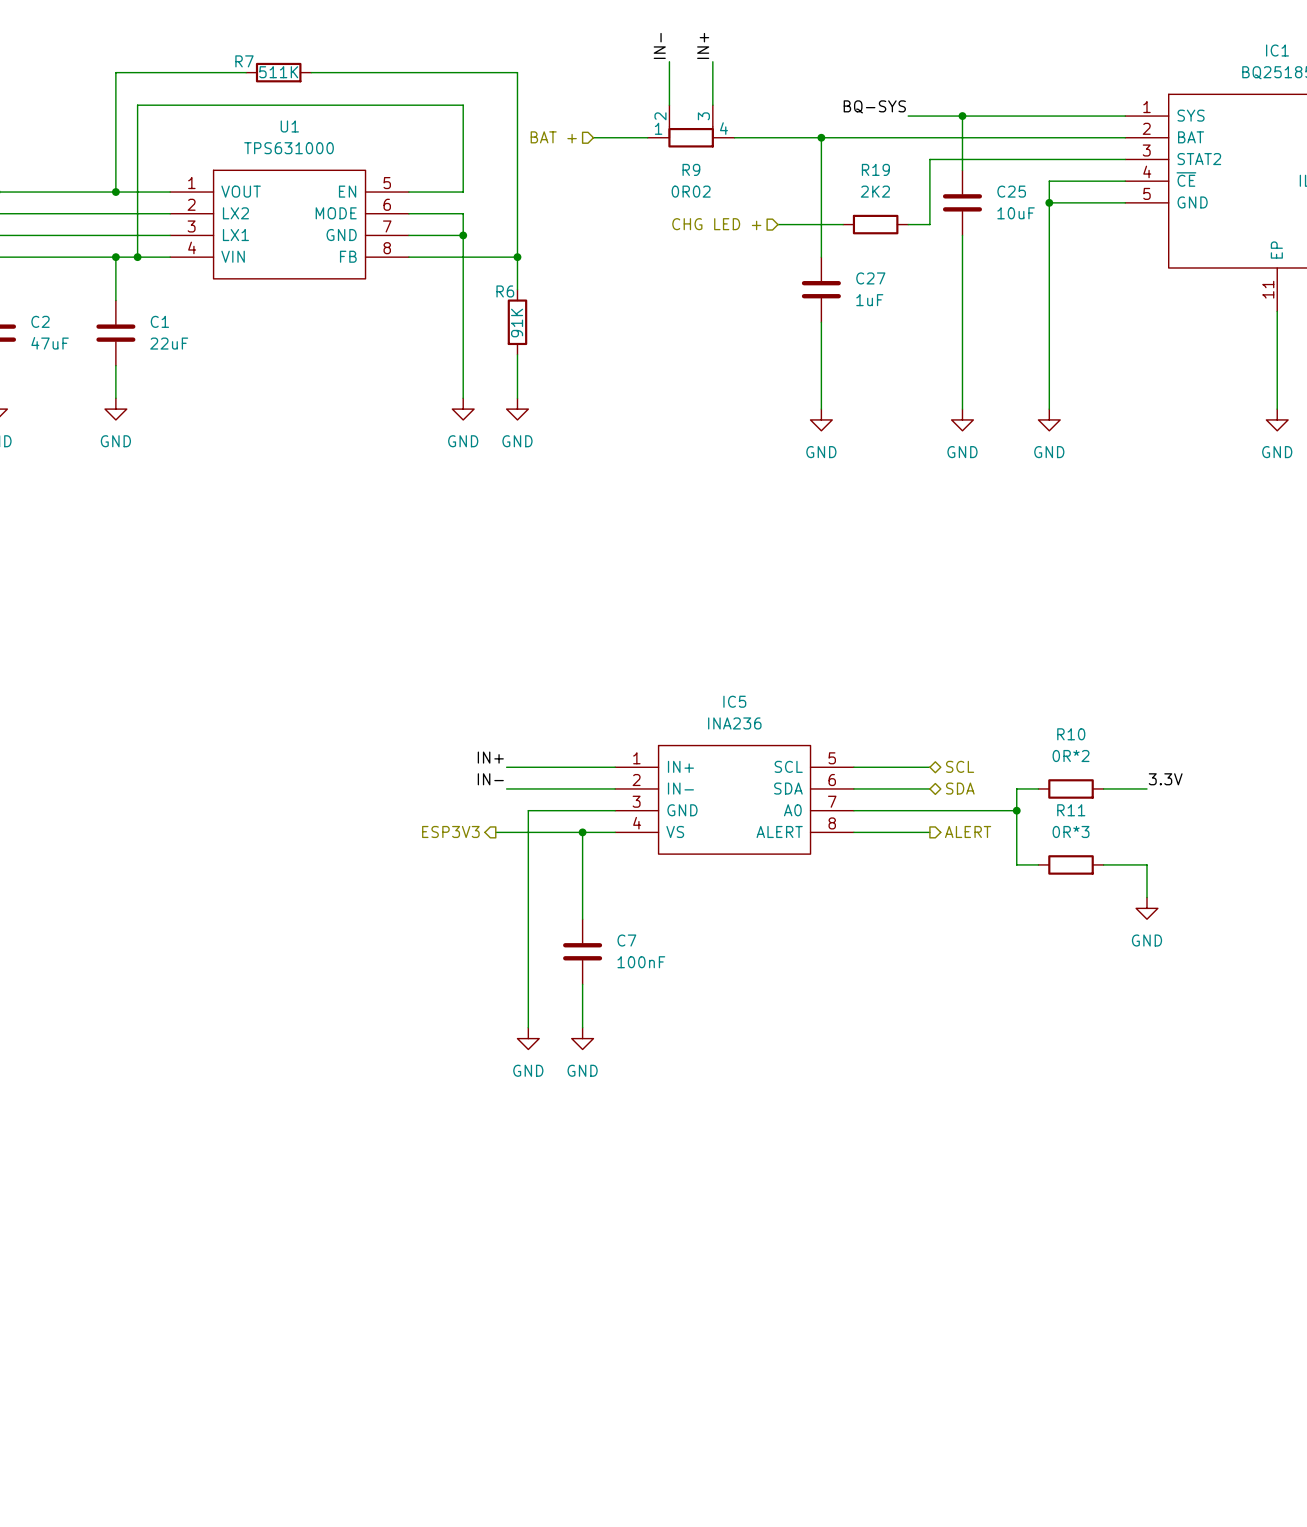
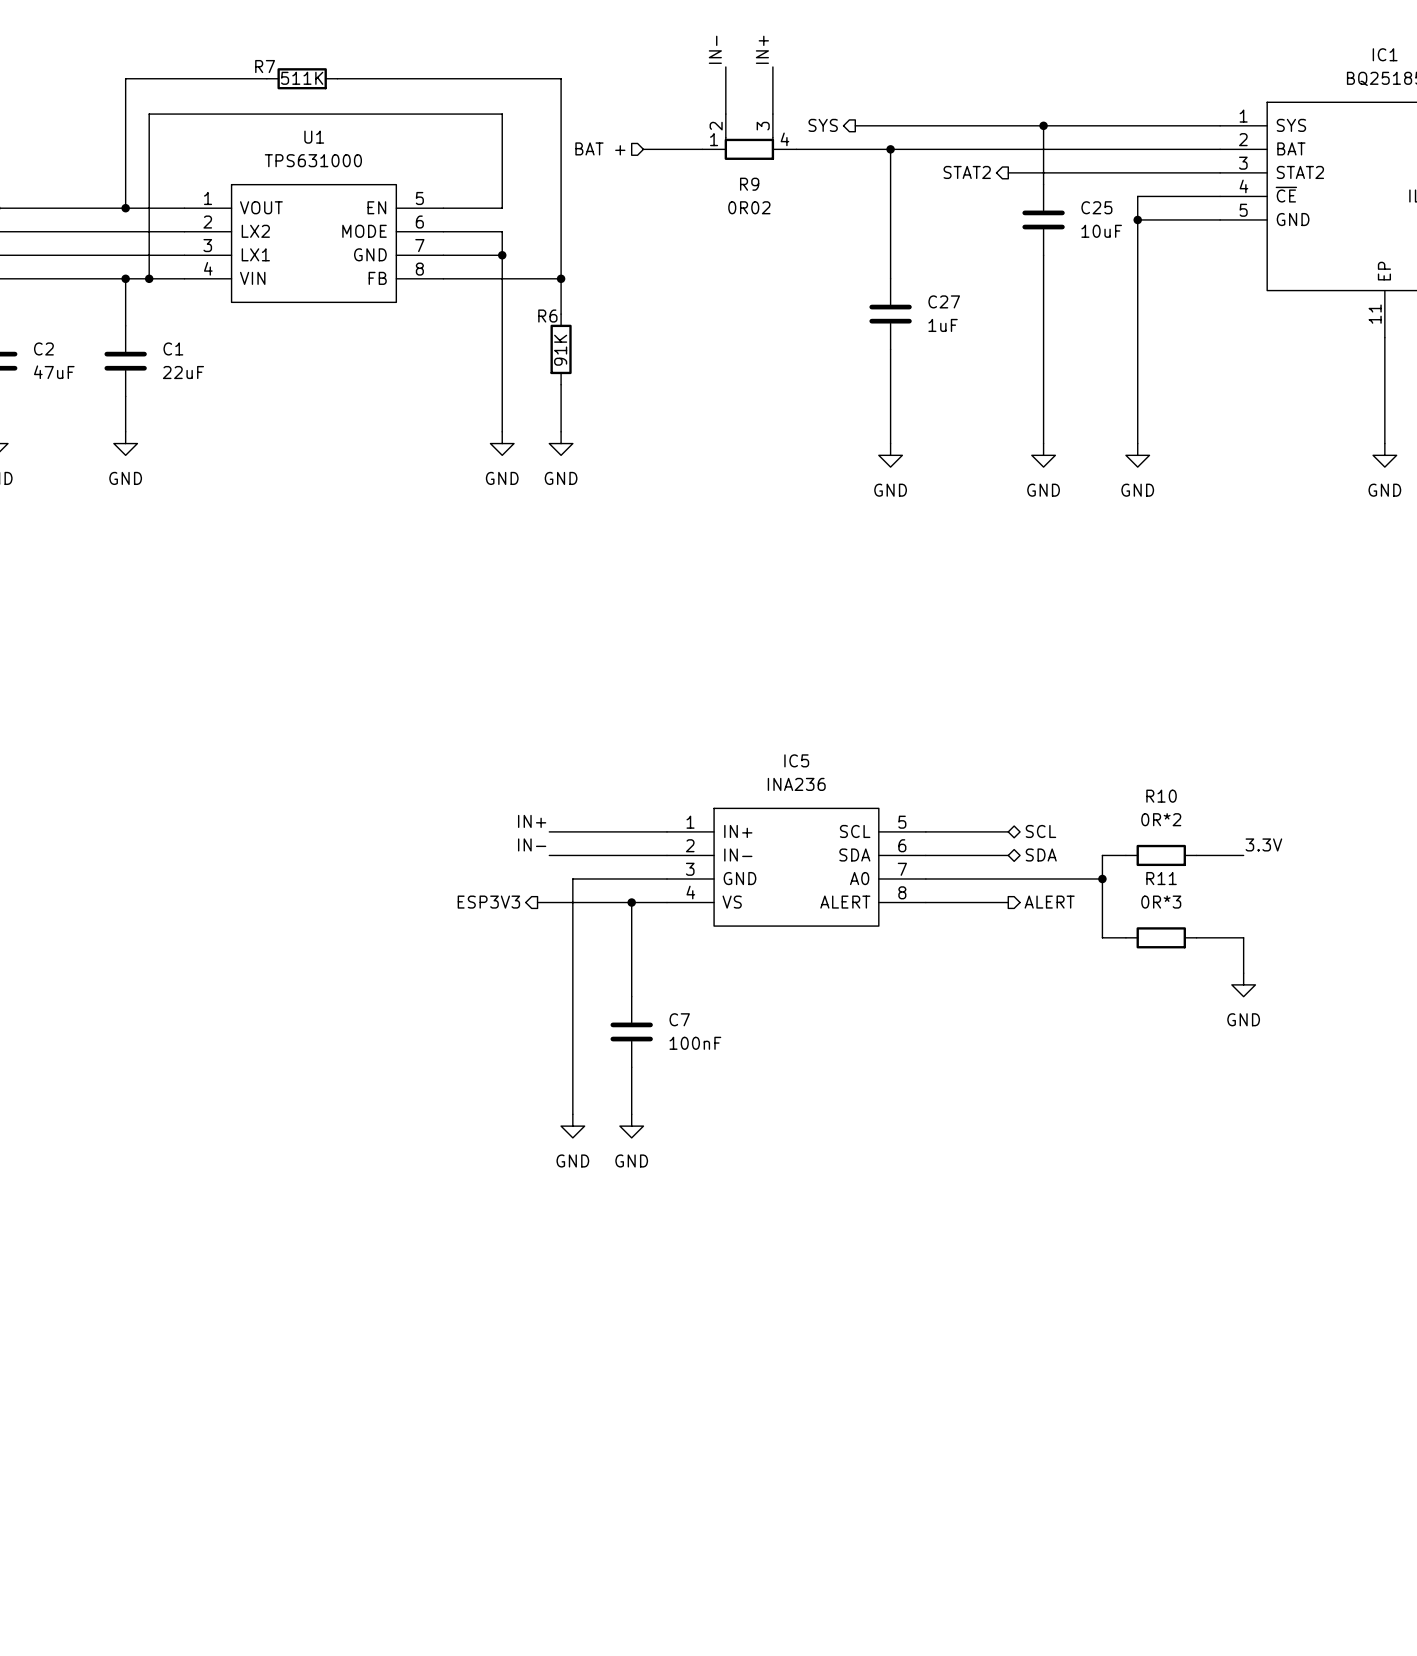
label: BQ-SYS (874, 106) -> none
hierarchical label: none -> SYS (823, 125)
wire: none -> (855, 125) (984, 125)
hierarchical label: none -> STAT2 (967, 172)
wire: (929, 159) (929, 224) (908, 224) -> none
hierarchical label: CHG LED + (716, 224) -> none
wire: (777, 224) (843, 224) -> none
R19: 2K2 (875, 224) -> none

